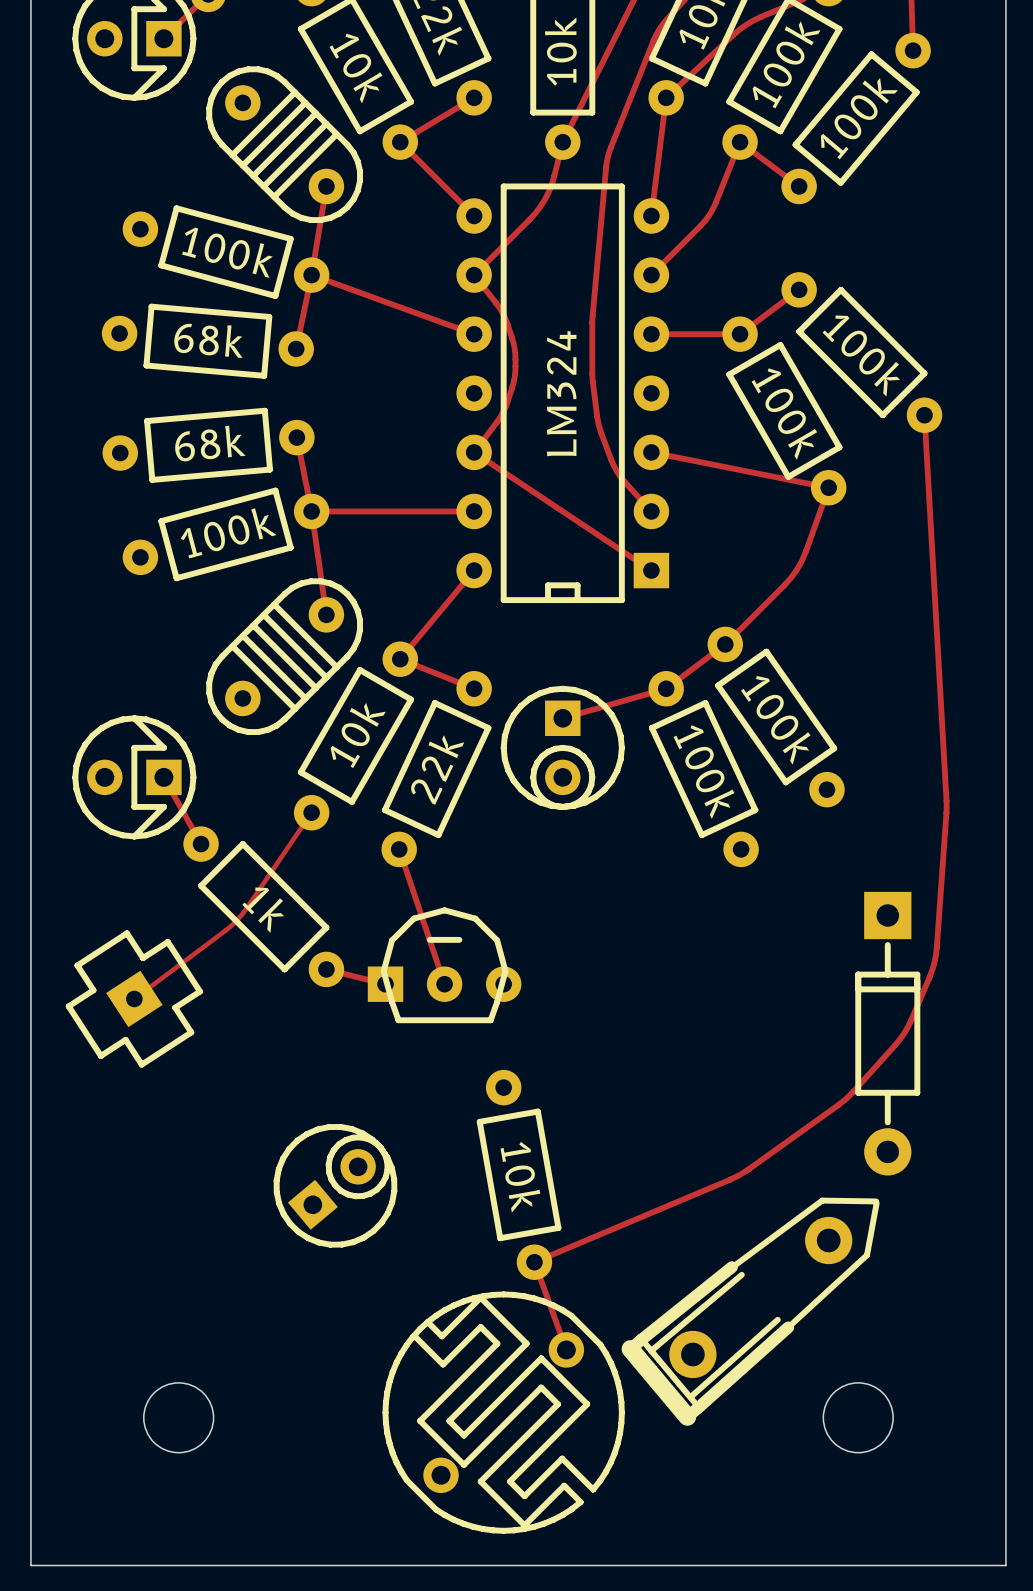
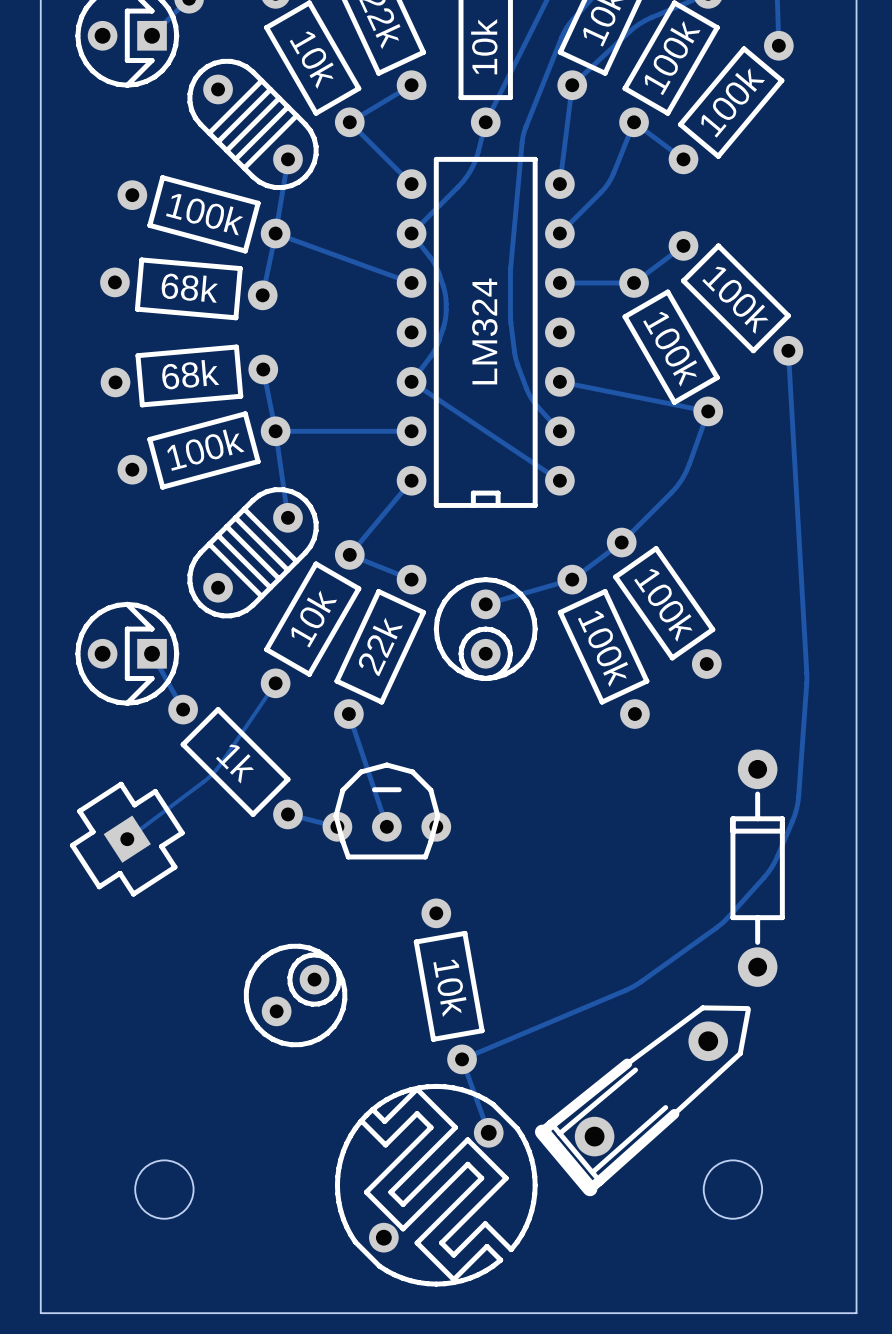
part footprint: [456, 183, 670, 604] -> [396, 156, 575, 508]
part footprint: [500, 685, 625, 810] -> [433, 577, 538, 681]
part footprint: [855, 891, 921, 1176] -> [730, 749, 785, 987]
part footprint: [367, 907, 522, 1024] -> [322, 762, 452, 860]
part footprint: [273, 1123, 398, 1248] -> [243, 943, 348, 1048]

